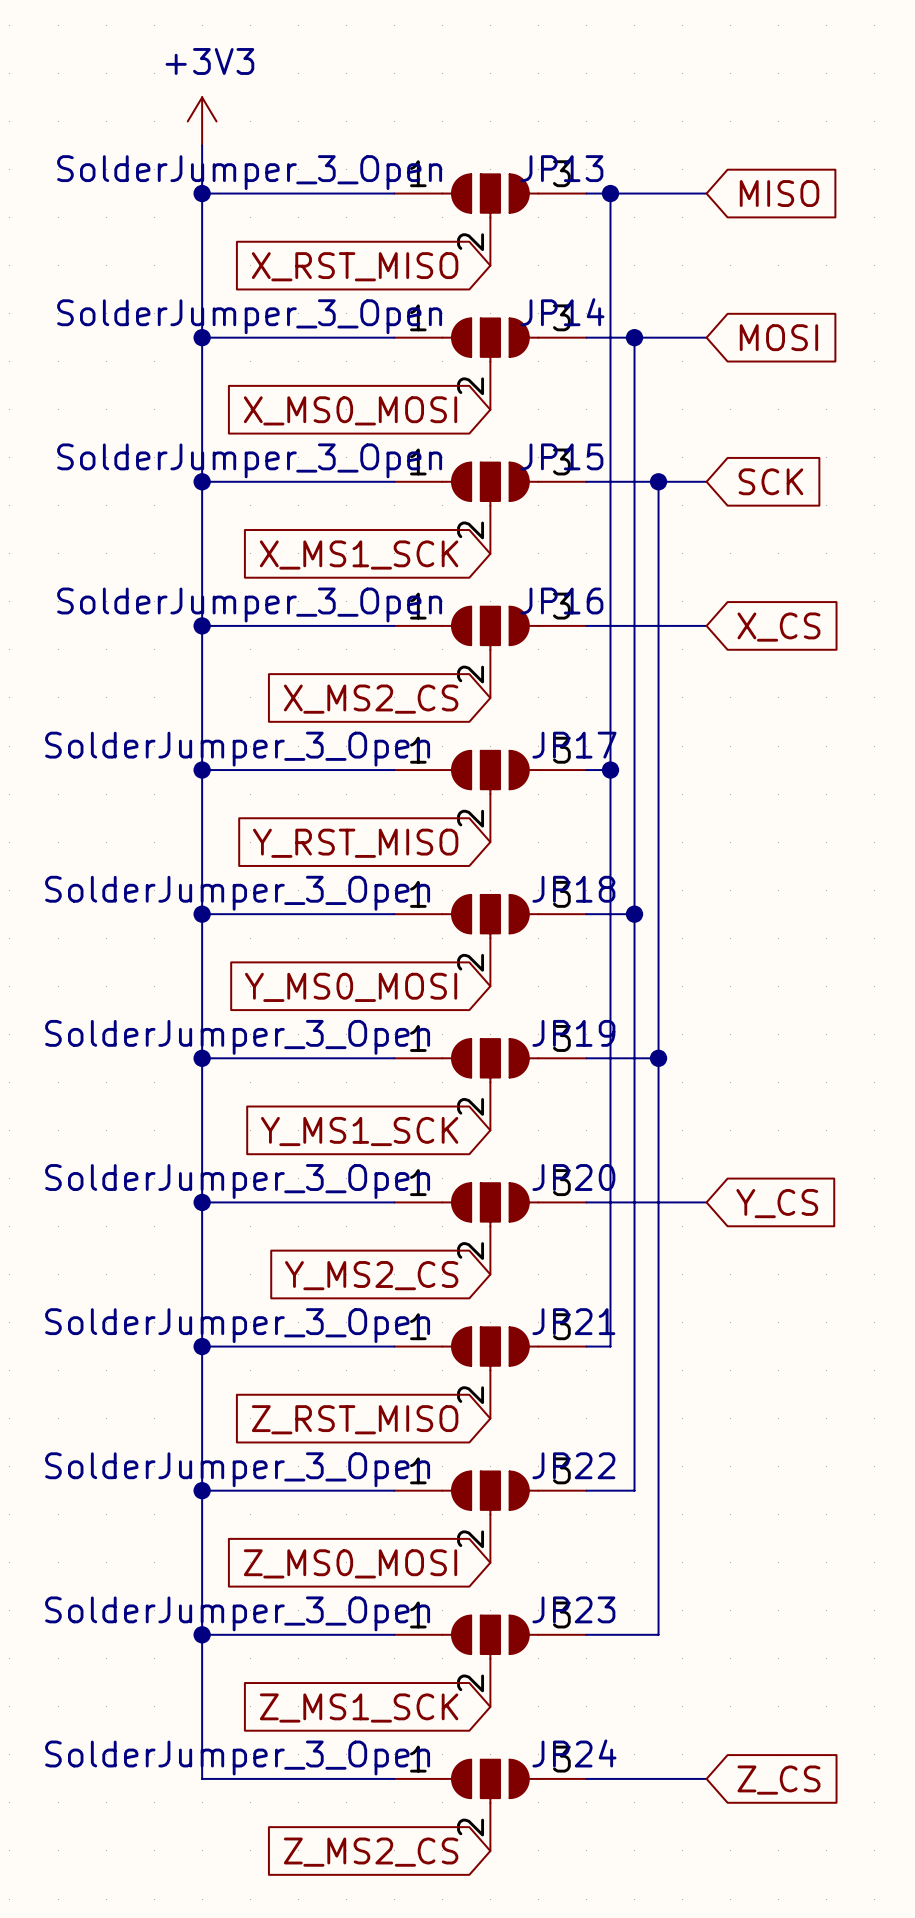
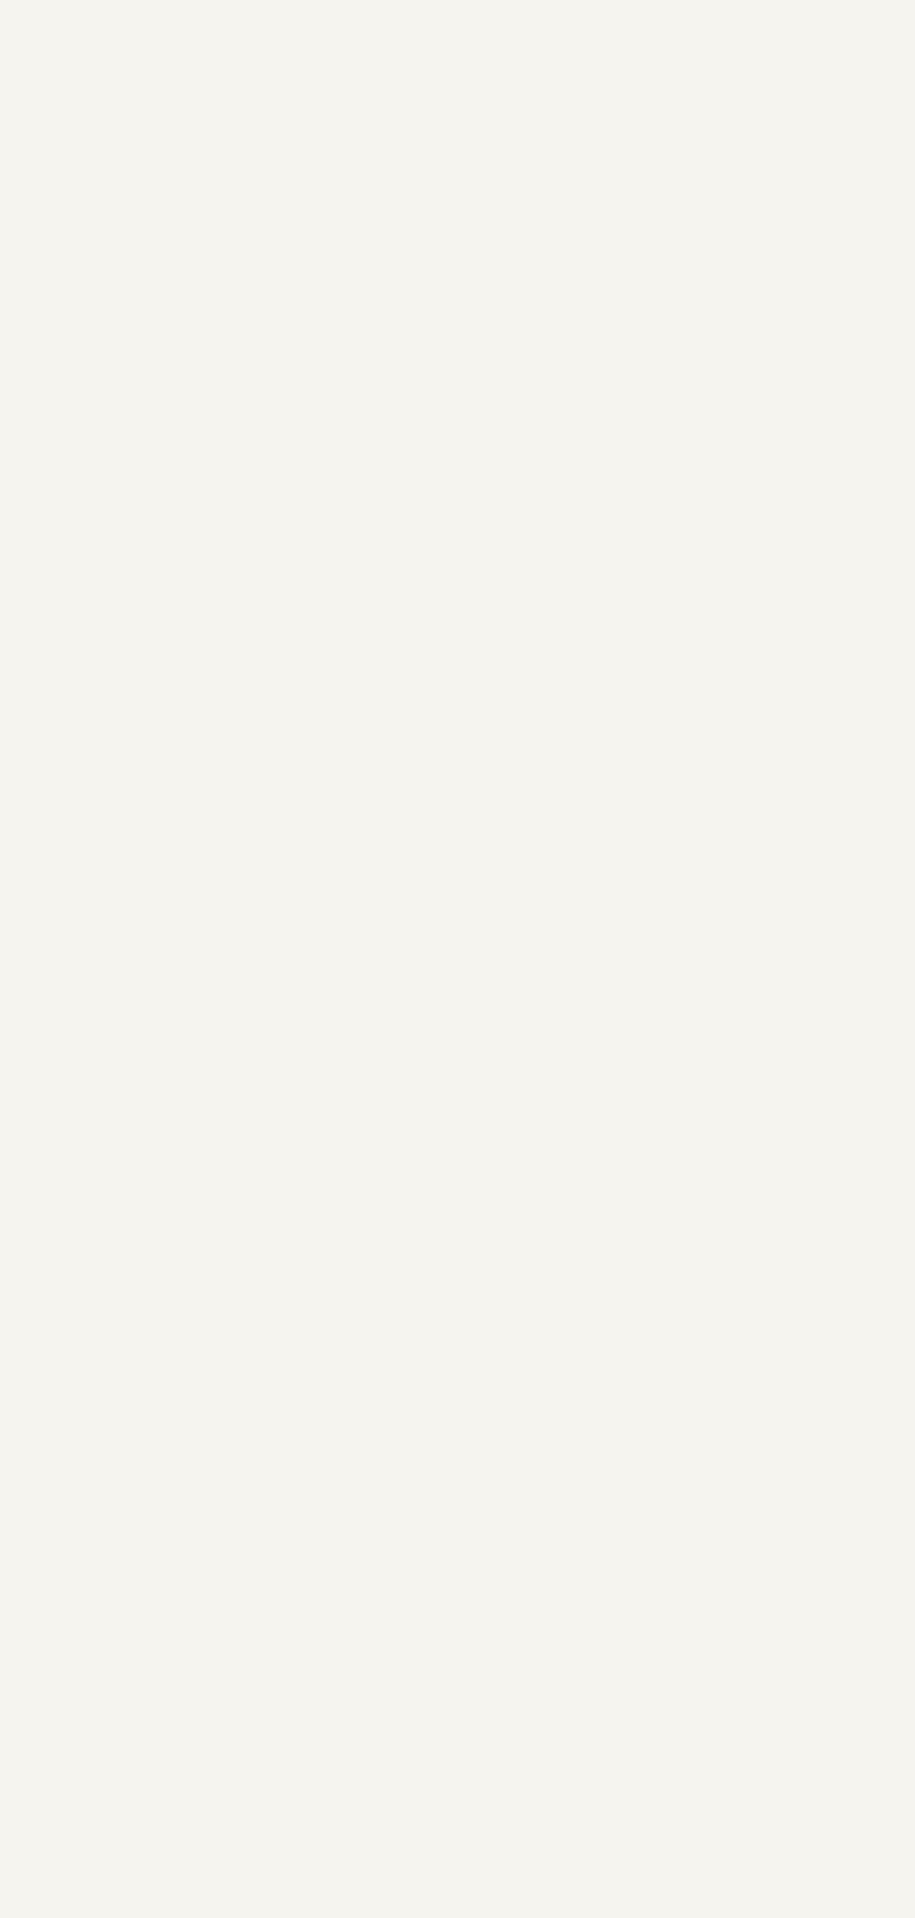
power symbol: +3V3 (202, 121) -> none
wire: (202, 145) (202, 1778) (394, 1778) -> none
wire: (202, 193) (394, 193) -> none
junction: (202, 193) -> none
wire: (586, 193) (706, 193) -> none
wire: (610, 193) (610, 1346) (586, 1346) -> none
junction: (610, 193) -> none
global label: MISO (779, 193) -> none
JP13: SolderJumper_3_Open (490, 219) -> none
global label: X_RST_MISO (355, 266) -> none
wire: (202, 337) (394, 337) -> none
junction: (202, 337) -> none
wire: (586, 337) (706, 337) -> none
wire: (634, 337) (634, 1490) (586, 1490) -> none
junction: (634, 337) -> none
global label: MOSI (778, 337) -> none
JP14: SolderJumper_3_Open (490, 364) -> none
global label: X_MS0_MOSI (350, 410) -> none
wire: (202, 481) (394, 481) -> none
junction: (202, 481) -> none
wire: (586, 481) (706, 481) -> none
wire: (658, 481) (658, 1634) (586, 1634) -> none
junction: (658, 481) -> none
global label: SCK (770, 481) -> none
JP15: SolderJumper_3_Open (490, 508) -> none
global label: X_MS1_SCK (359, 555) -> none
wire: (202, 625) (394, 625) -> none
junction: (202, 625) -> none
wire: (586, 625) (706, 625) -> none
global label: X_CS (778, 627) -> none
JP16: SolderJumper_3_Open (490, 652) -> none
global label: X_MS2_CS (371, 699) -> none
wire: (202, 770) (394, 770) -> none
junction: (202, 770) -> none
wire: (586, 770) (610, 770) -> none
junction: (610, 770) -> none
JP17: SolderJumper_3_Open (490, 796) -> none
global label: Y_RST_MISO (355, 843) -> none
wire: (202, 914) (394, 914) -> none
junction: (202, 914) -> none
wire: (586, 914) (634, 914) -> none
junction: (634, 914) -> none
JP18: SolderJumper_3_Open (490, 940) -> none
global label: Y_MS0_MOSI (351, 987) -> none
wire: (202, 1058) (394, 1058) -> none
junction: (202, 1058) -> none
wire: (586, 1058) (658, 1058) -> none
junction: (658, 1058) -> none
JP19: SolderJumper_3_Open (490, 1084) -> none
global label: Y_MS1_SCK (359, 1131) -> none
wire: (202, 1202) (394, 1202) -> none
junction: (202, 1202) -> none
wire: (586, 1202) (706, 1202) -> none
global label: Y_CS (777, 1203) -> none
JP20: SolderJumper_3_Open (490, 1228) -> none
global label: Y_MS2_CS (371, 1275) -> none
wire: (202, 1346) (394, 1346) -> none
junction: (202, 1346) -> none
JP21: SolderJumper_3_Open (490, 1372) -> none
global label: Z_RST_MISO (355, 1419) -> none
wire: (202, 1490) (394, 1490) -> none
junction: (202, 1490) -> none
JP22: SolderJumper_3_Open (490, 1517) -> none
global label: Z_MS0_MOSI (350, 1563) -> none
wire: (202, 1634) (394, 1634) -> none
junction: (202, 1634) -> none
JP23: SolderJumper_3_Open (490, 1661) -> none
global label: Z_MS1_SCK (359, 1708) -> none
wire: (586, 1778) (706, 1778) -> none
global label: Z_CS (778, 1780) -> none
JP24: SolderJumper_3_Open (490, 1805) -> none
global label: Z_MS2_CS (371, 1852) -> none

